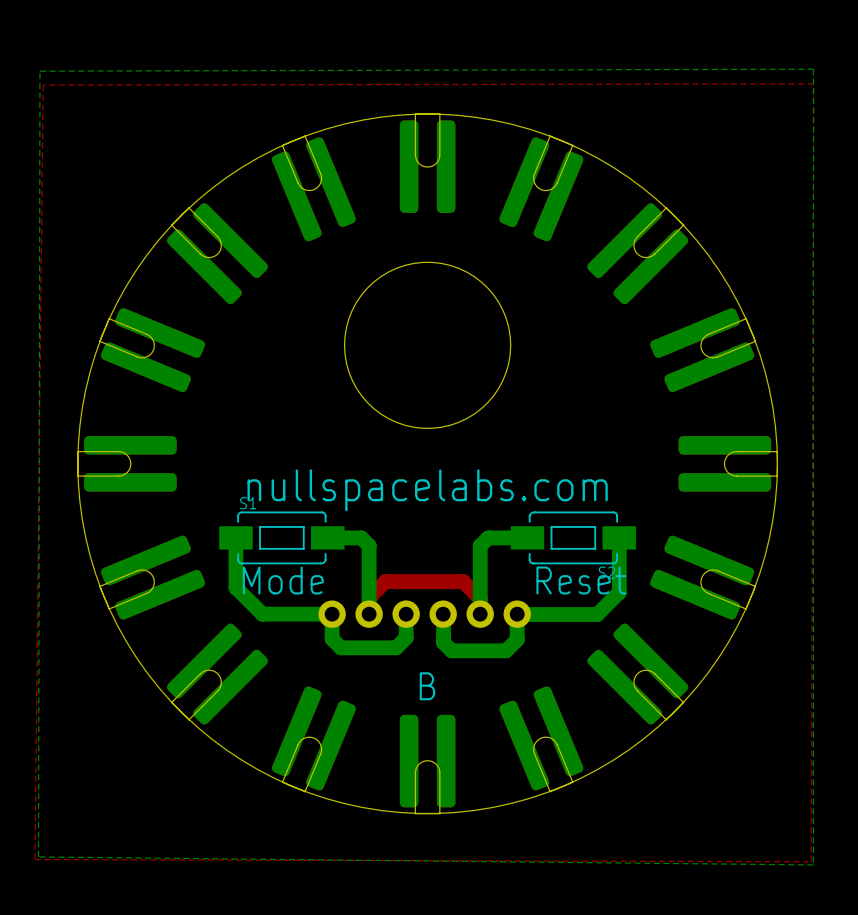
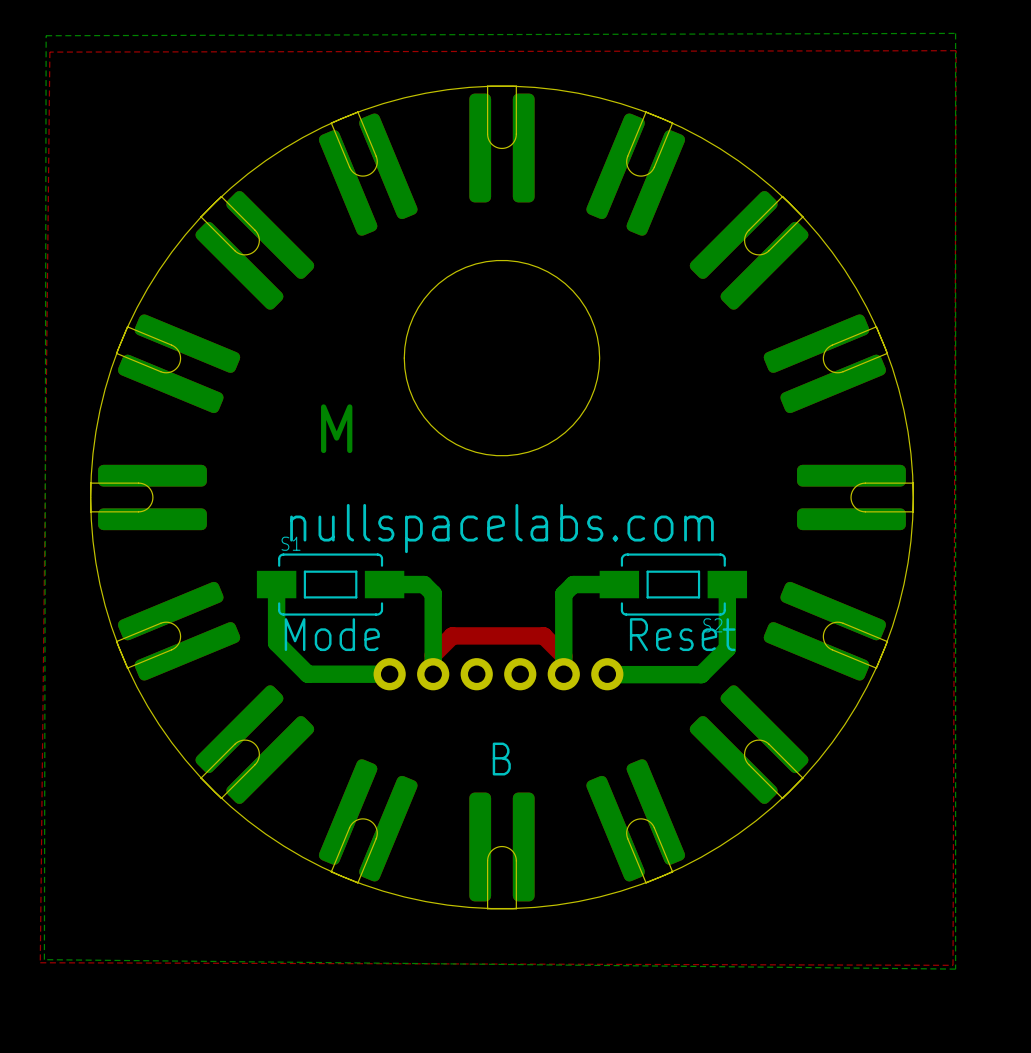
text: none -> M (336, 428)
bottom track: (406, 614) (406, 637) (396, 647) (341, 647) (332, 638) (332, 614) -> none
bottom track: (517, 614) (517, 639) (506, 650) (451, 650) (443, 642) (443, 614) -> none

